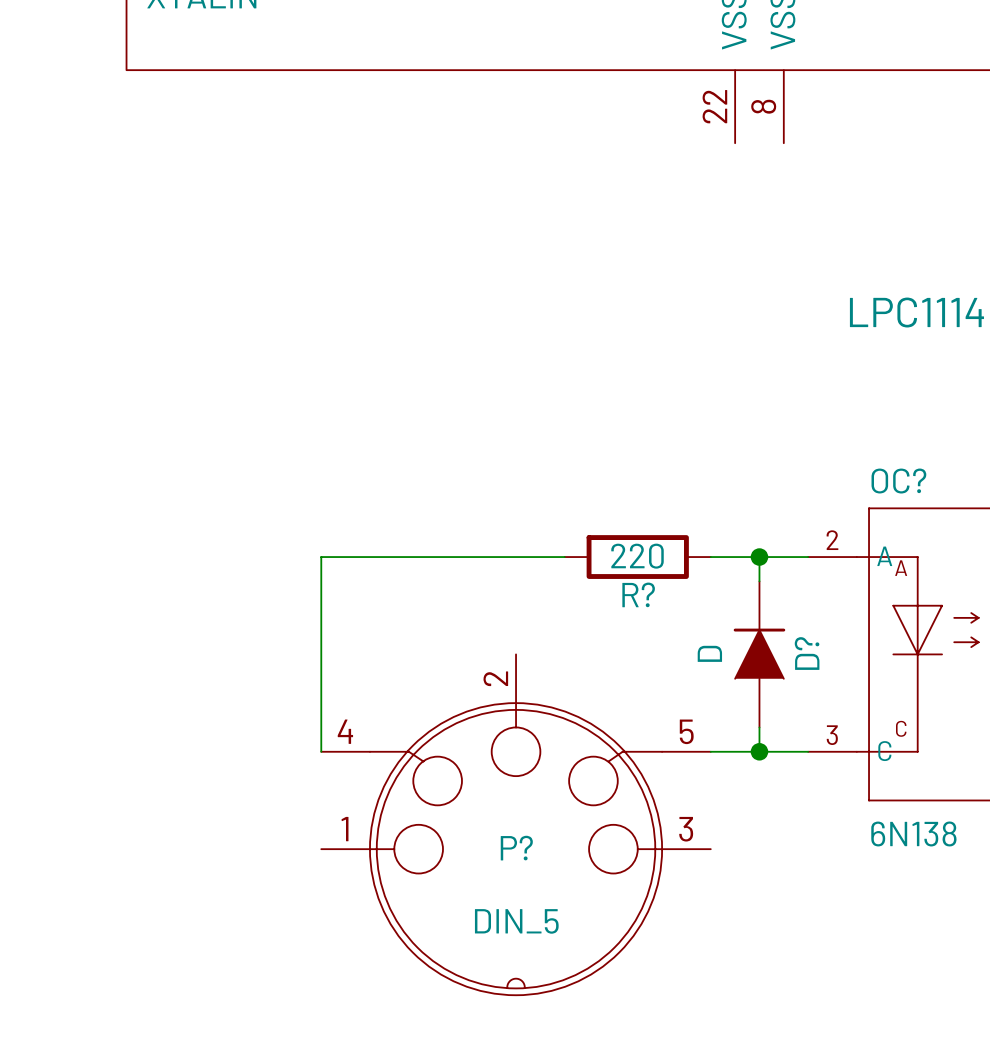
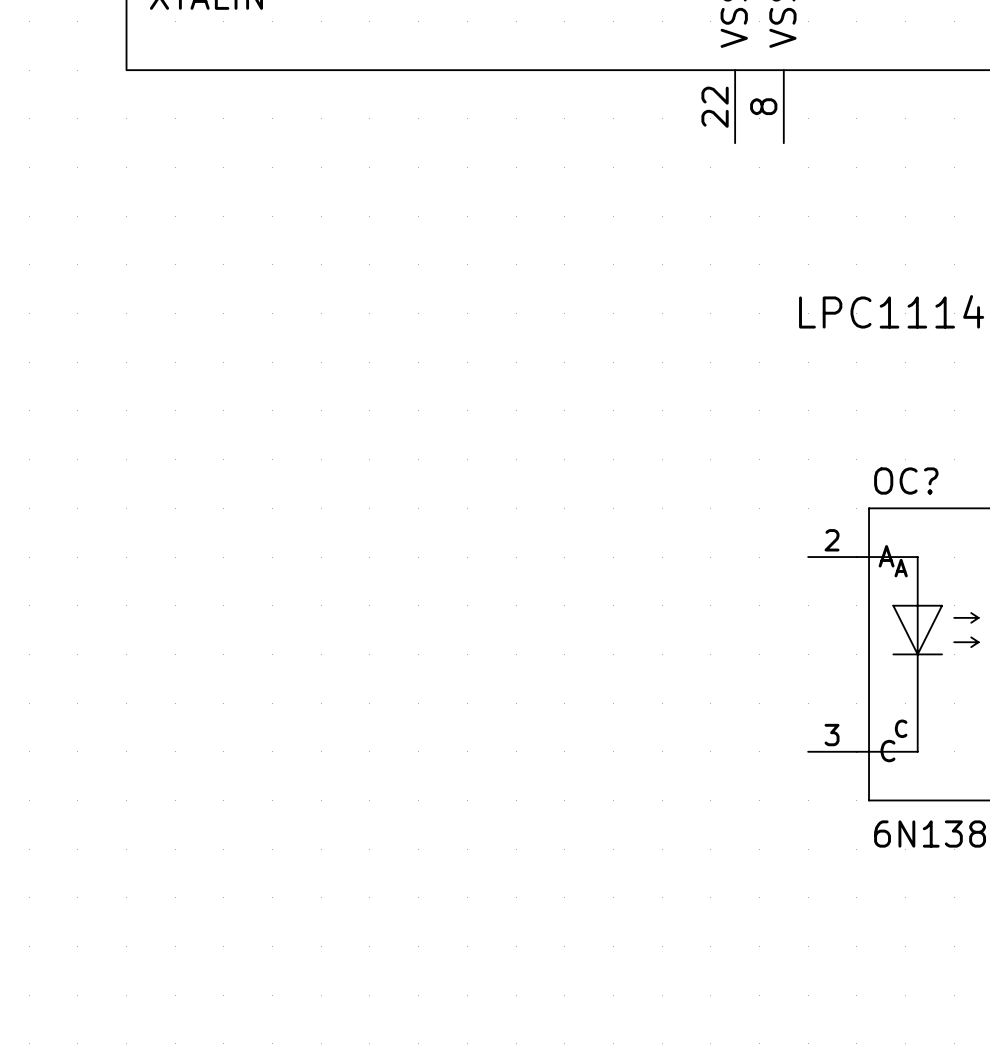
wire: (564, 557) (321, 557) (321, 751) -> none
R?: 220 (637, 557) -> none
wire: (710, 557) (808, 557) -> none
wire: (759, 557) (759, 581) -> none
junction: (759, 557) -> none
D?: D (759, 654) -> none
wire: (759, 727) (759, 751) -> none
wire: (710, 751) (808, 751) -> none
junction: (759, 751) -> none
P?: DIN_5 (516, 824) -> none

